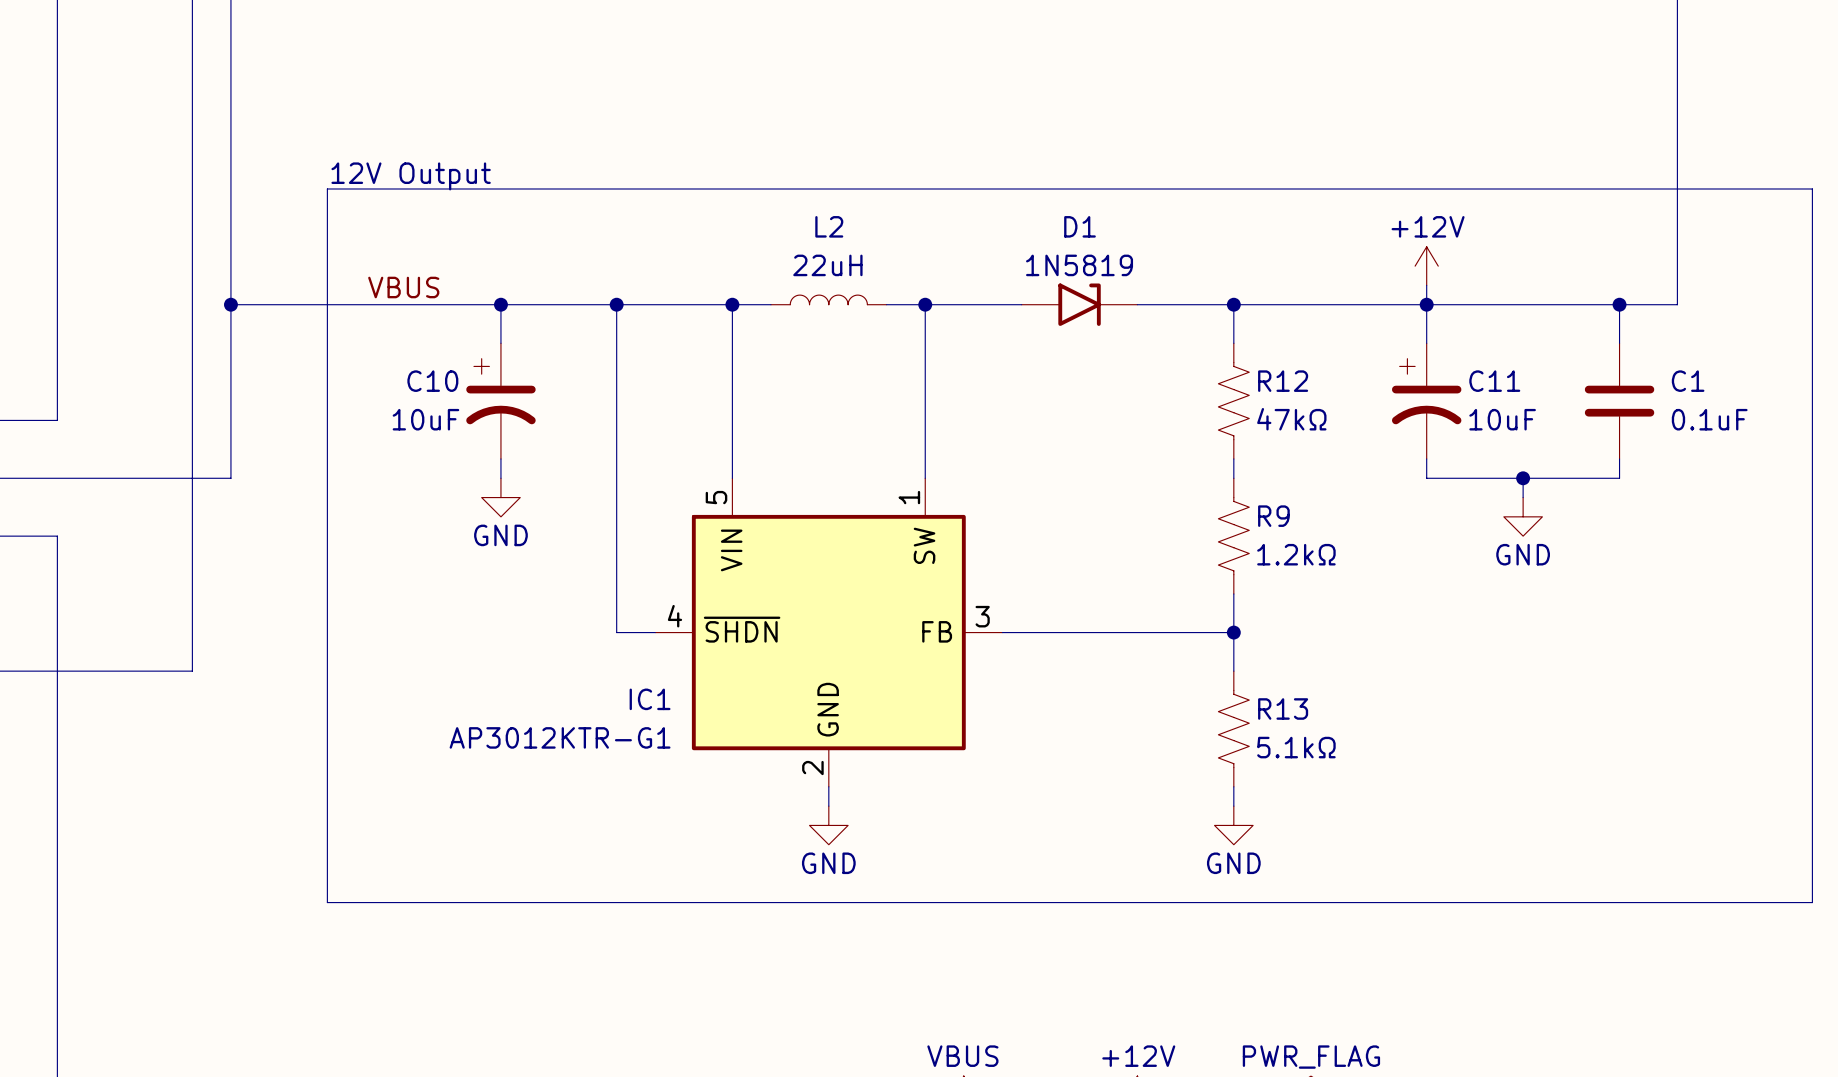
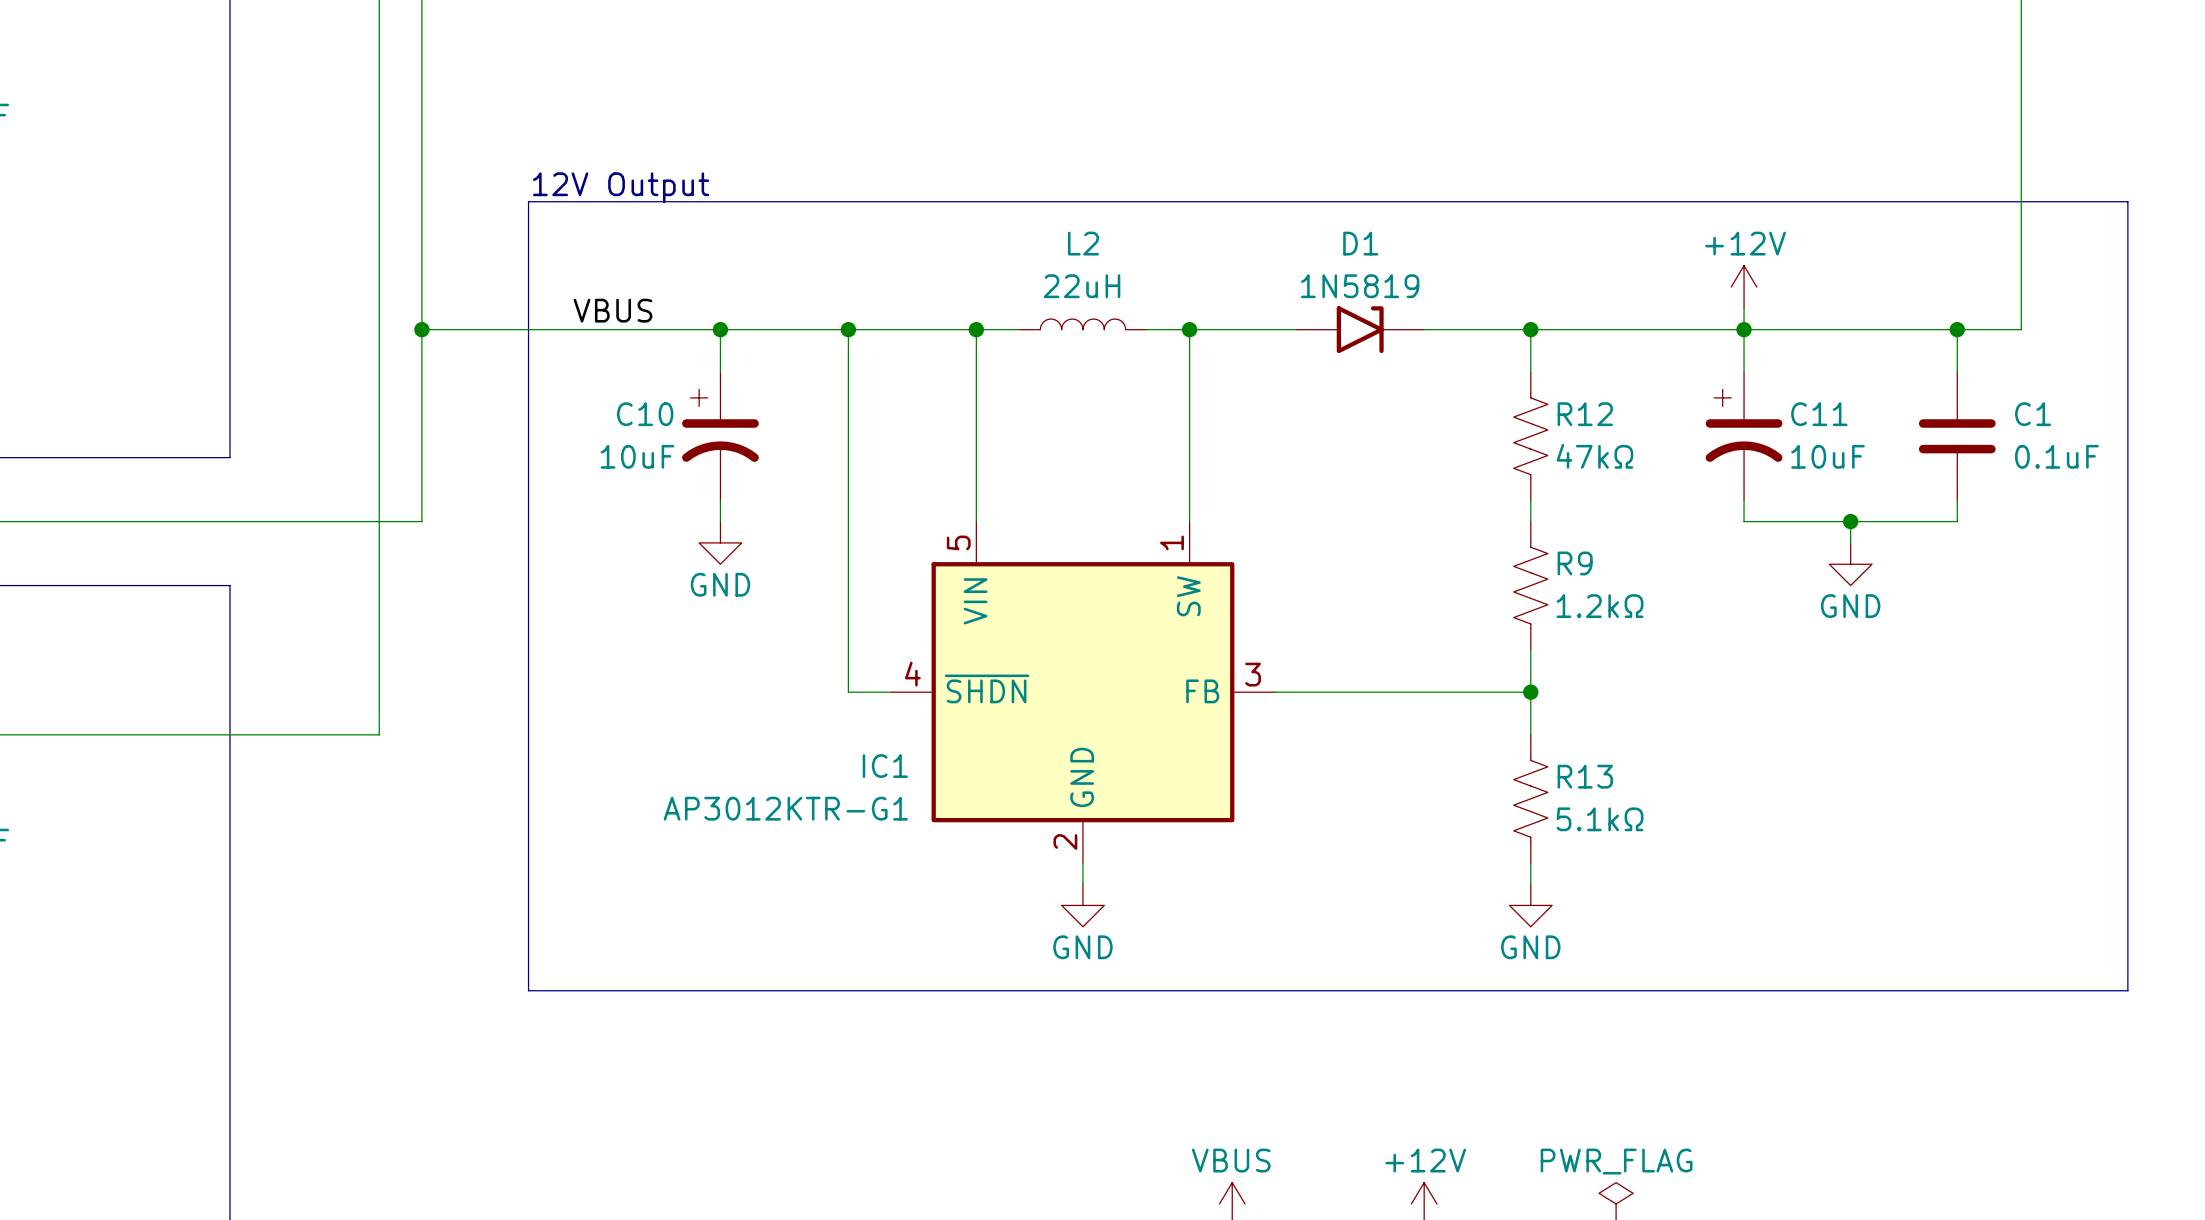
line: (1773, 188) (1812, 188) (1812, 902) (1773, 902) -> (2127, 201) (2127, 990)

